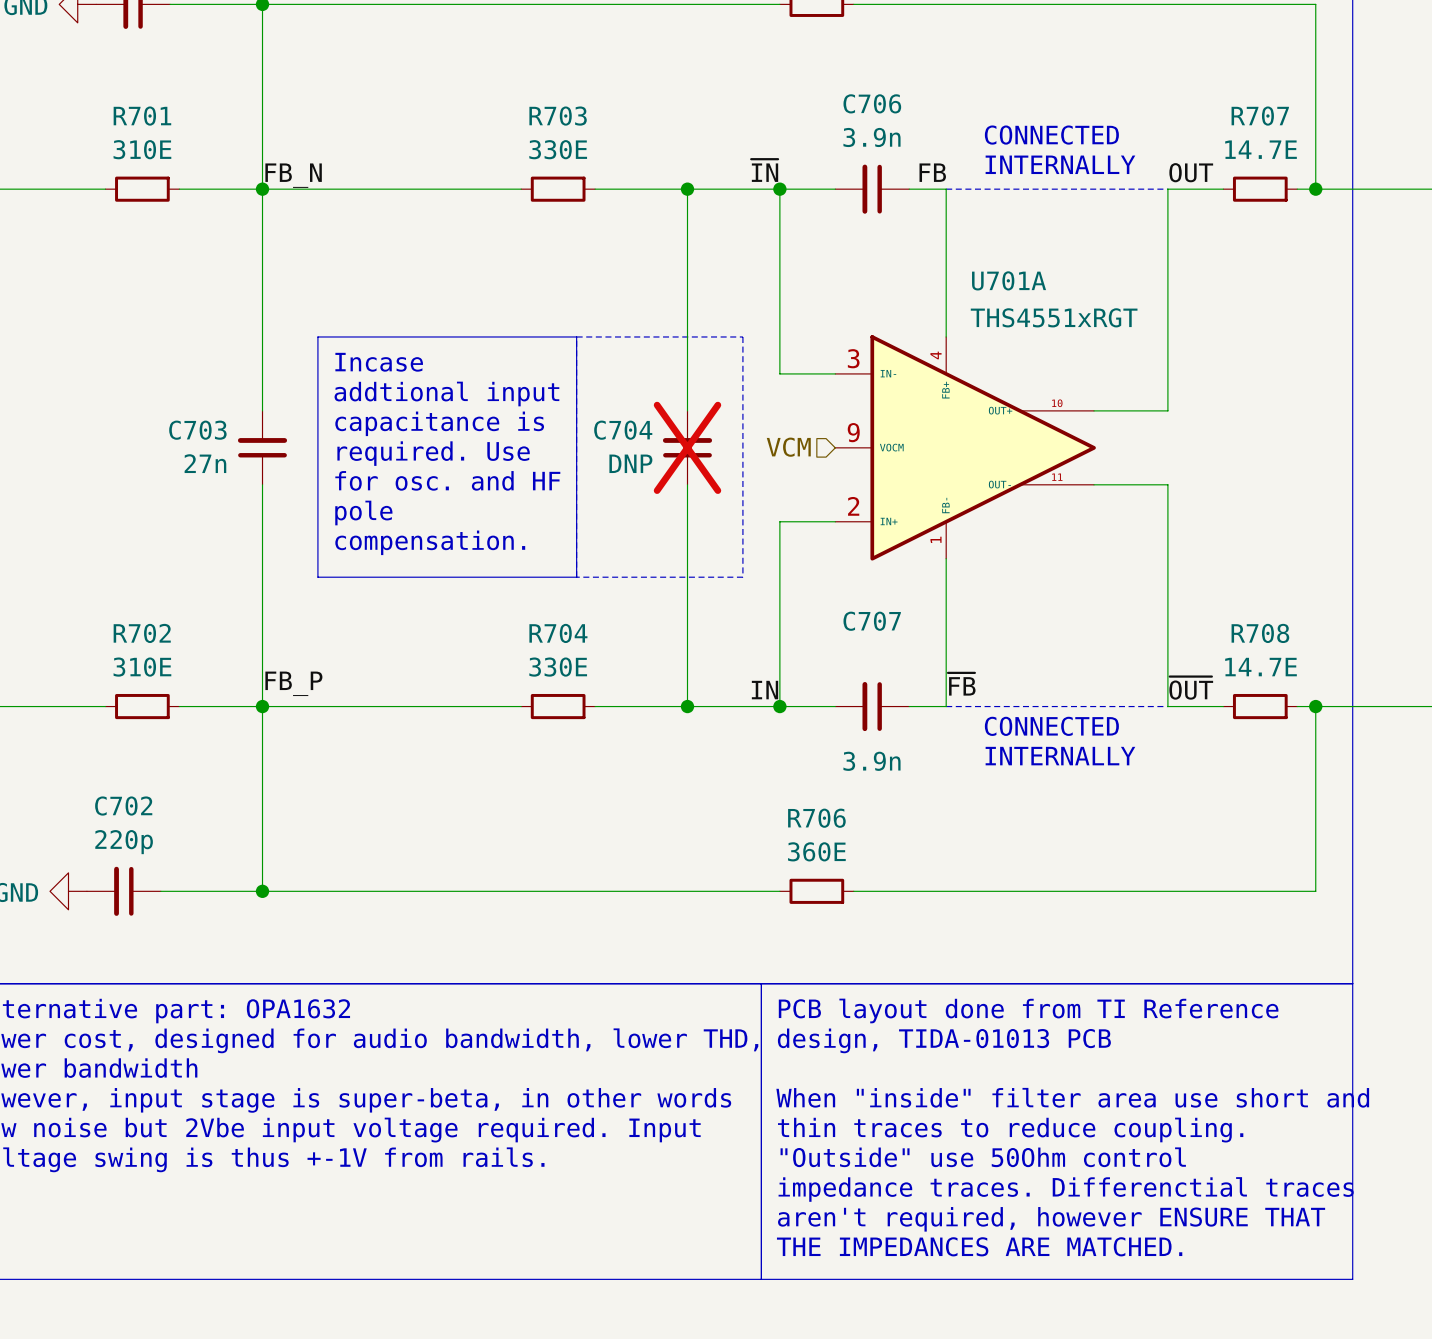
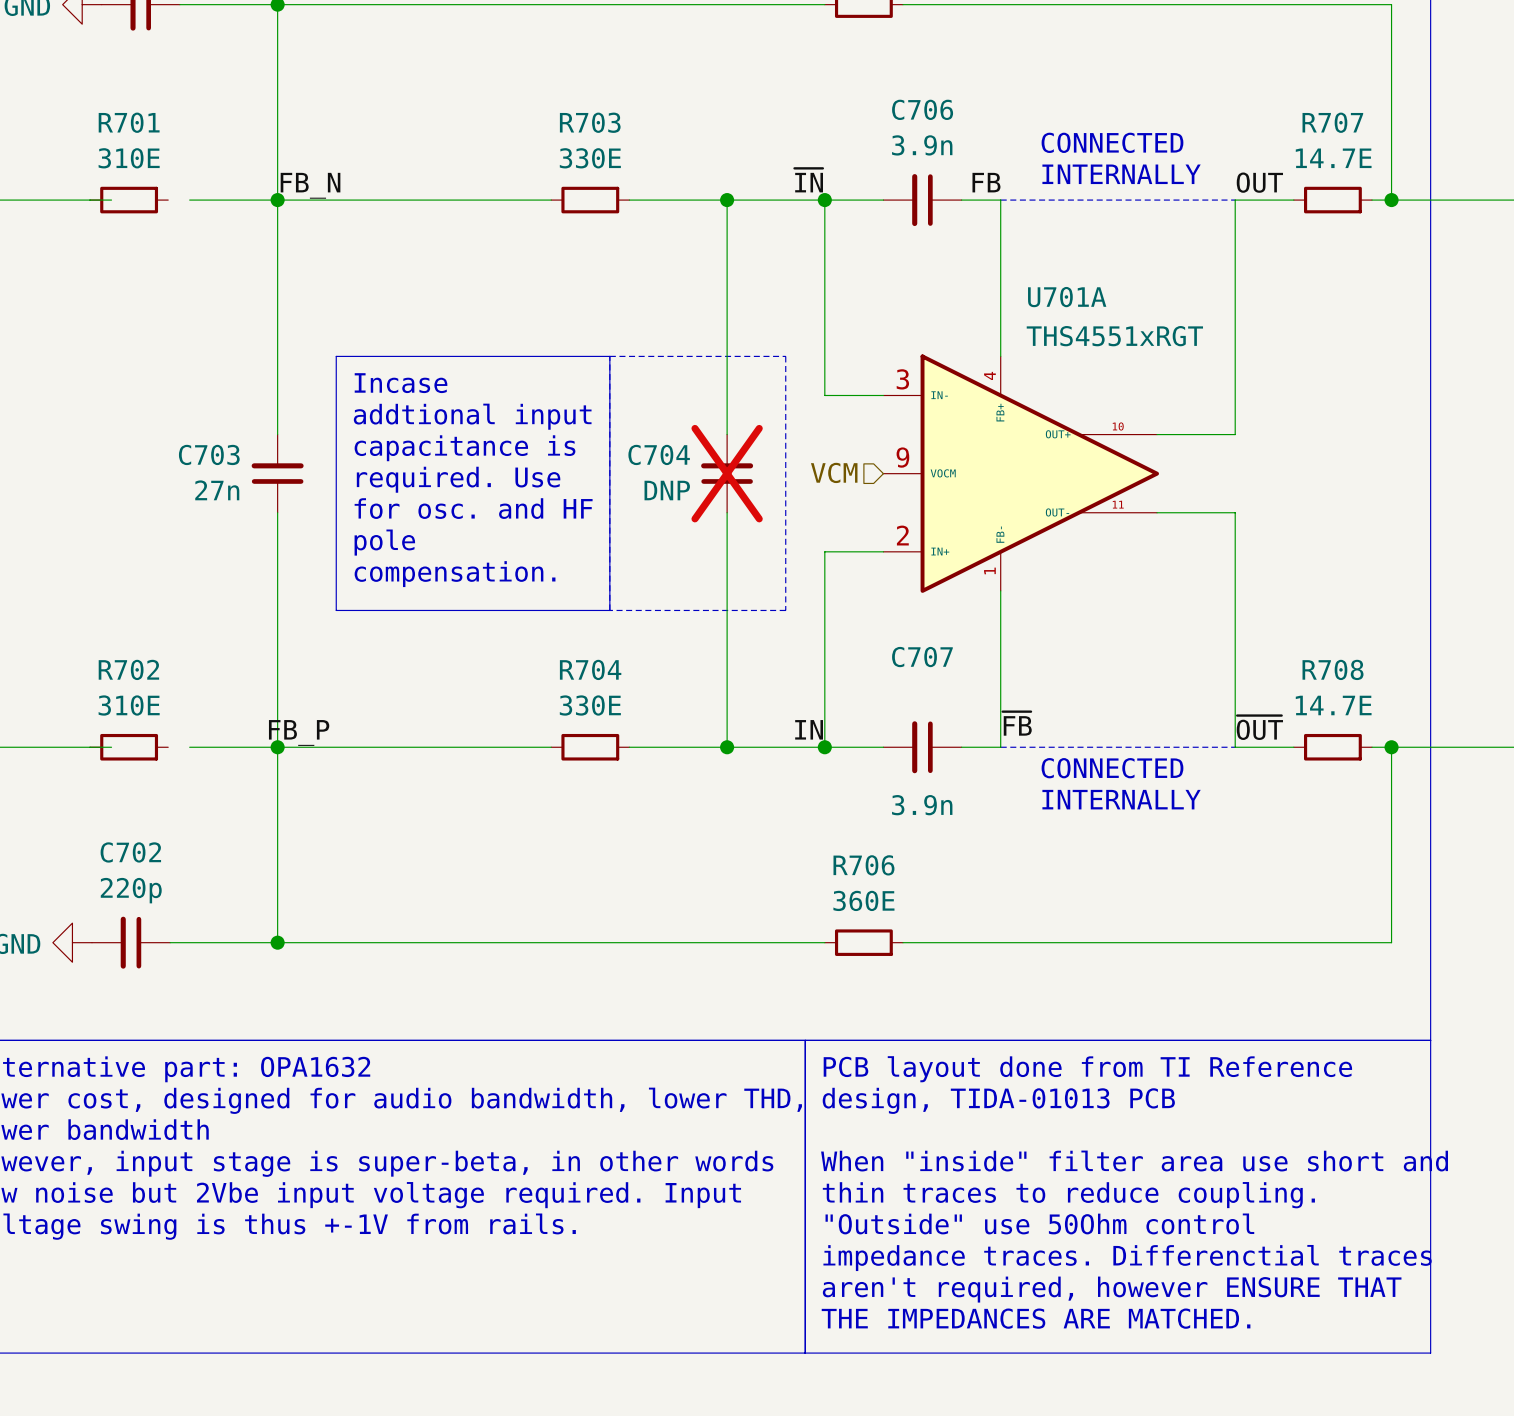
R701 position: (142, 189) -> (129, 200)
label position: FB_P (293, 683) -> FB_P (299, 732)
R702 position: (142, 706) -> (129, 747)

